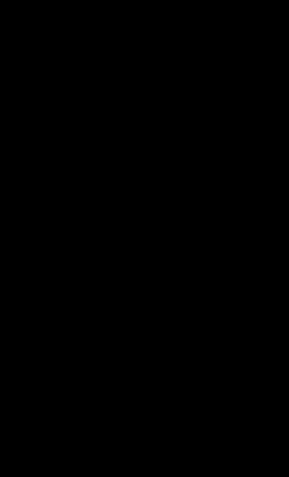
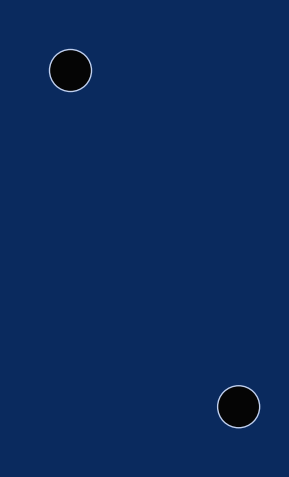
part: none -> (70, 70)
part: none -> (238, 406)

